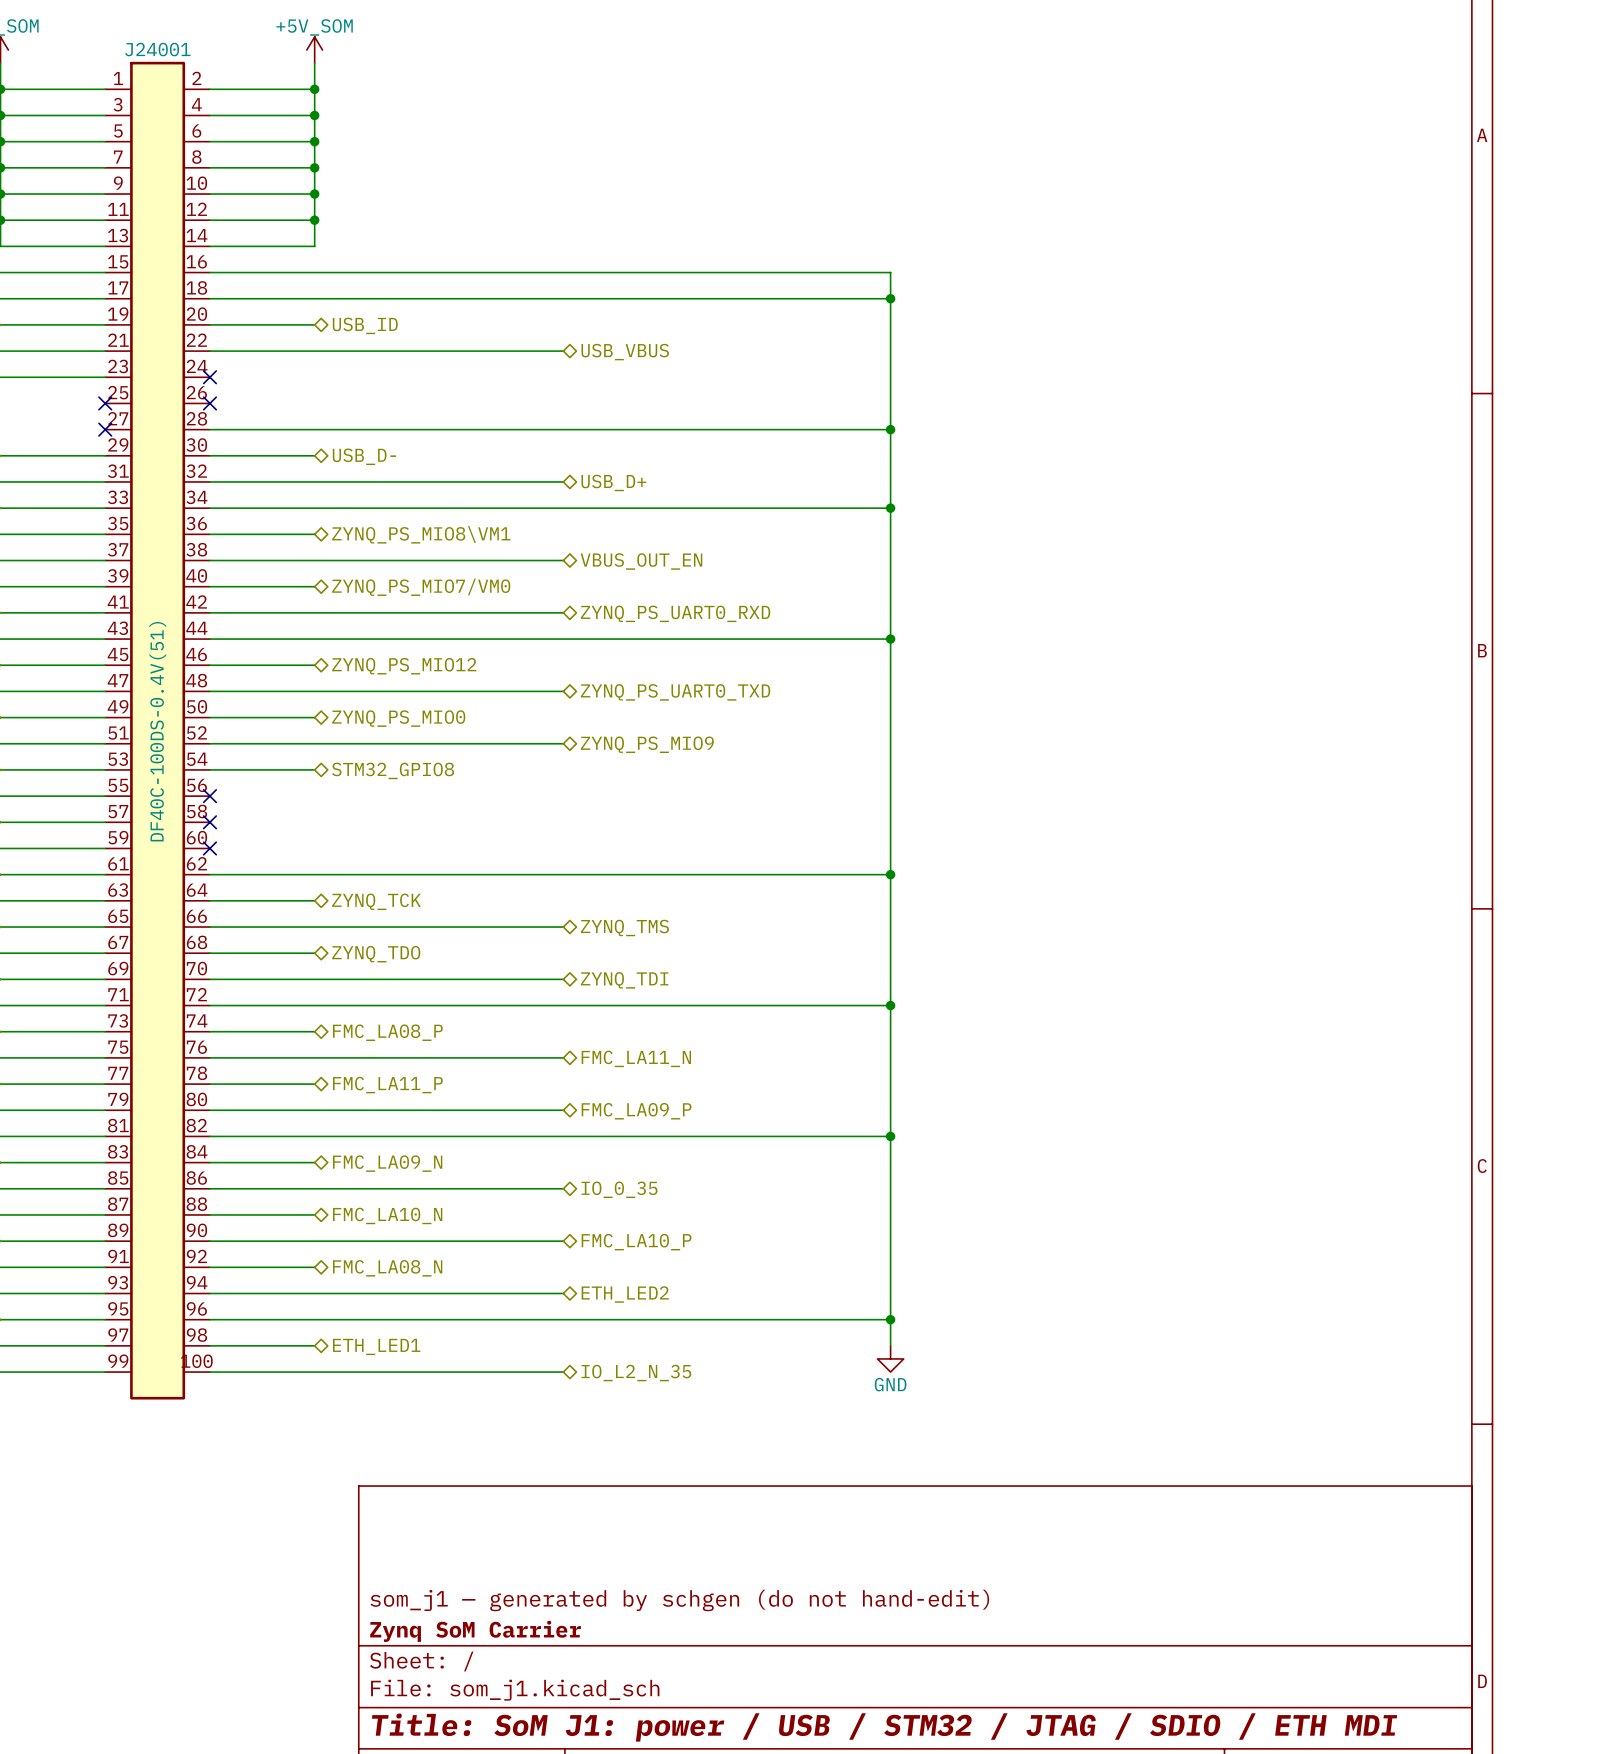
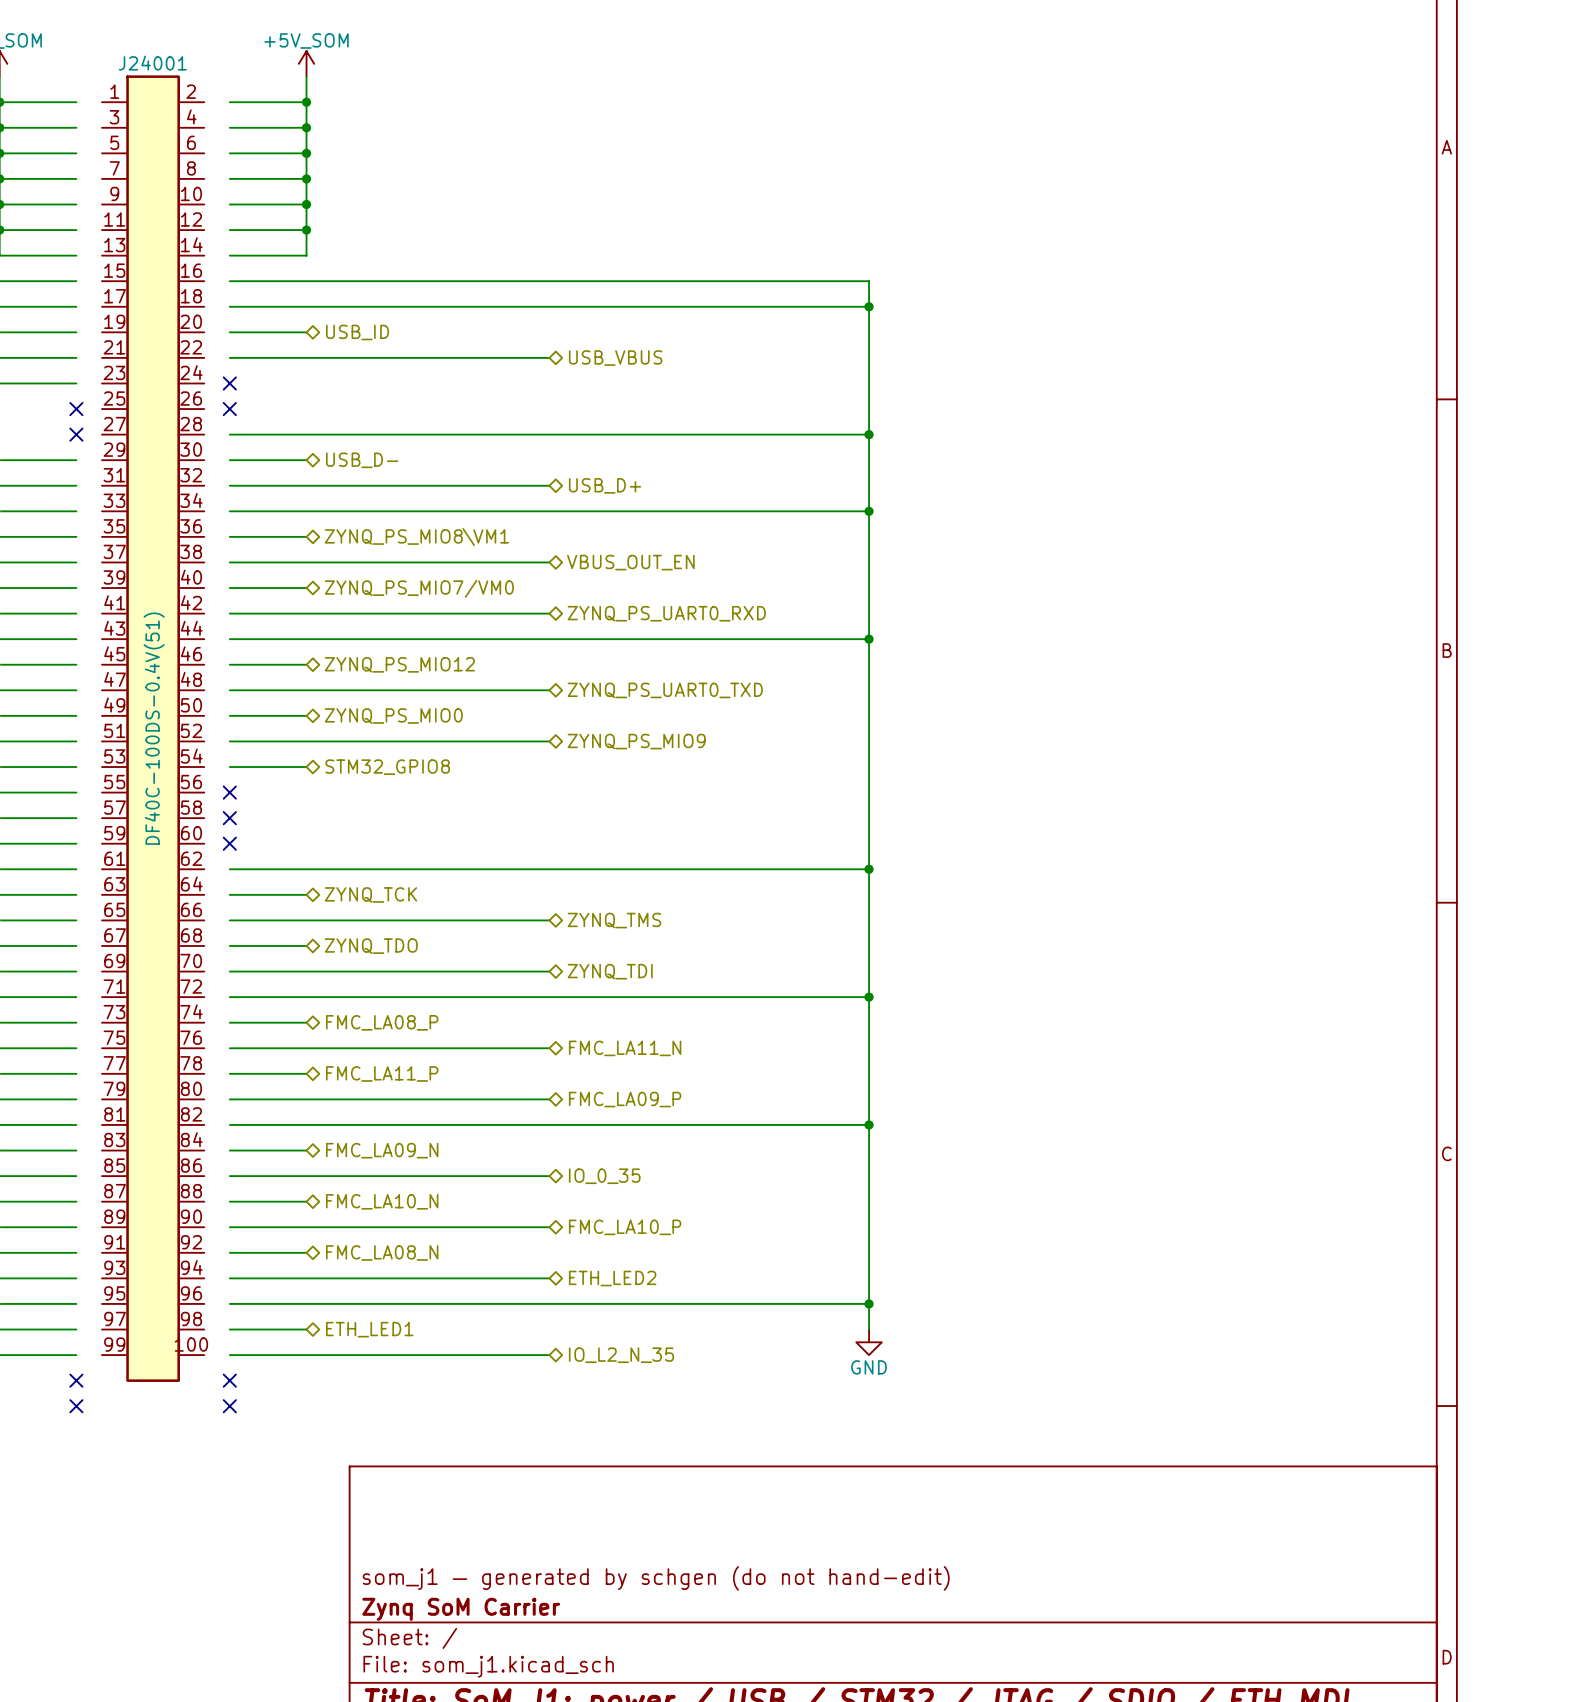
wire: (79, 89) (105, 89) -> none
wire: (209, 89) (236, 89) -> none
wire: (79, 115) (105, 115) -> none
wire: (209, 115) (236, 115) -> none
wire: (79, 141) (105, 141) -> none
wire: (209, 141) (236, 141) -> none
wire: (79, 167) (105, 167) -> none
wire: (209, 167) (236, 167) -> none
wire: (79, 194) (105, 194) -> none
wire: (209, 194) (236, 194) -> none
wire: (79, 220) (105, 220) -> none
wire: (209, 220) (236, 220) -> none
wire: (79, 246) (105, 246) -> none
wire: (209, 246) (236, 246) -> none
wire: (79, 272) (105, 272) -> none
wire: (209, 272) (236, 272) -> none
wire: (79, 298) (105, 298) -> none
wire: (209, 298) (236, 298) -> none
wire: (79, 324) (105, 324) -> none
wire: (209, 324) (236, 324) -> none
wire: (79, 351) (105, 351) -> none
wire: (209, 351) (236, 351) -> none
wire: (79, 377) (105, 377) -> none
no-connect mark: (209, 377) -> none
no-connect mark: none -> (229, 383)
no-connect mark: none -> (76, 409)
no-connect mark: (105, 403) -> none
no-connect mark: (209, 403) -> none
no-connect mark: none -> (229, 409)
no-connect mark: none -> (76, 434)
no-connect mark: (105, 429) -> none
wire: (209, 429) (236, 429) -> none
wire: (79, 455) (105, 455) -> none
wire: (209, 455) (236, 455) -> none
wire: (79, 481) (105, 481) -> none
wire: (209, 481) (236, 481) -> none
wire: (79, 508) (105, 508) -> none
wire: (209, 508) (236, 508) -> none
wire: (79, 534) (105, 534) -> none
wire: (209, 534) (236, 534) -> none
wire: (79, 560) (105, 560) -> none
wire: (209, 560) (236, 560) -> none
wire: (79, 586) (105, 586) -> none
wire: (209, 586) (236, 586) -> none
wire: (79, 612) (105, 612) -> none
wire: (209, 612) (236, 612) -> none
wire: (79, 639) (105, 639) -> none
wire: (209, 639) (236, 639) -> none
wire: (79, 665) (105, 665) -> none
wire: (209, 665) (236, 665) -> none
wire: (79, 691) (105, 691) -> none
wire: (209, 691) (236, 691) -> none
wire: (79, 717) (105, 717) -> none
wire: (209, 717) (236, 717) -> none
wire: (79, 743) (105, 743) -> none
wire: (209, 743) (236, 743) -> none
wire: (79, 769) (105, 769) -> none
wire: (209, 769) (236, 769) -> none
wire: (79, 796) (105, 796) -> none
no-connect mark: (209, 796) -> none
no-connect mark: none -> (229, 792)
wire: (79, 822) (105, 822) -> none
no-connect mark: (209, 822) -> none
no-connect mark: none -> (229, 818)
wire: (79, 848) (105, 848) -> none
no-connect mark: (209, 848) -> none
no-connect mark: none -> (229, 843)
wire: (79, 874) (105, 874) -> none
wire: (209, 874) (236, 874) -> none
wire: (79, 900) (105, 900) -> none
wire: (209, 900) (236, 900) -> none
wire: (79, 927) (105, 927) -> none
wire: (209, 927) (236, 927) -> none
wire: (79, 953) (105, 953) -> none
wire: (209, 953) (236, 953) -> none
wire: (79, 979) (105, 979) -> none
wire: (209, 979) (236, 979) -> none
wire: (79, 1005) (105, 1005) -> none
wire: (209, 1005) (236, 1005) -> none
wire: (79, 1031) (105, 1031) -> none
wire: (209, 1031) (236, 1031) -> none
wire: (79, 1057) (105, 1057) -> none
wire: (209, 1057) (236, 1057) -> none
wire: (79, 1084) (105, 1084) -> none
wire: (209, 1084) (236, 1084) -> none
wire: (79, 1110) (105, 1110) -> none
wire: (209, 1110) (236, 1110) -> none
wire: (79, 1136) (105, 1136) -> none
wire: (209, 1136) (236, 1136) -> none
wire: (79, 1162) (105, 1162) -> none
wire: (209, 1162) (236, 1162) -> none
wire: (79, 1188) (105, 1188) -> none
wire: (209, 1188) (236, 1188) -> none
wire: (79, 1214) (105, 1214) -> none
wire: (209, 1214) (236, 1214) -> none
wire: (79, 1241) (105, 1241) -> none
wire: (209, 1241) (236, 1241) -> none
wire: (79, 1267) (105, 1267) -> none
wire: (209, 1267) (236, 1267) -> none
wire: (79, 1293) (105, 1293) -> none
wire: (209, 1293) (236, 1293) -> none
wire: (79, 1319) (105, 1319) -> none
wire: (209, 1319) (236, 1319) -> none
wire: (79, 1345) (105, 1345) -> none
wire: (209, 1345) (236, 1345) -> none
wire: (79, 1372) (105, 1372) -> none
wire: (209, 1372) (236, 1372) -> none
no-connect mark: none -> (76, 1380)
no-connect mark: none -> (229, 1380)
no-connect mark: none -> (76, 1406)
no-connect mark: none -> (229, 1406)

